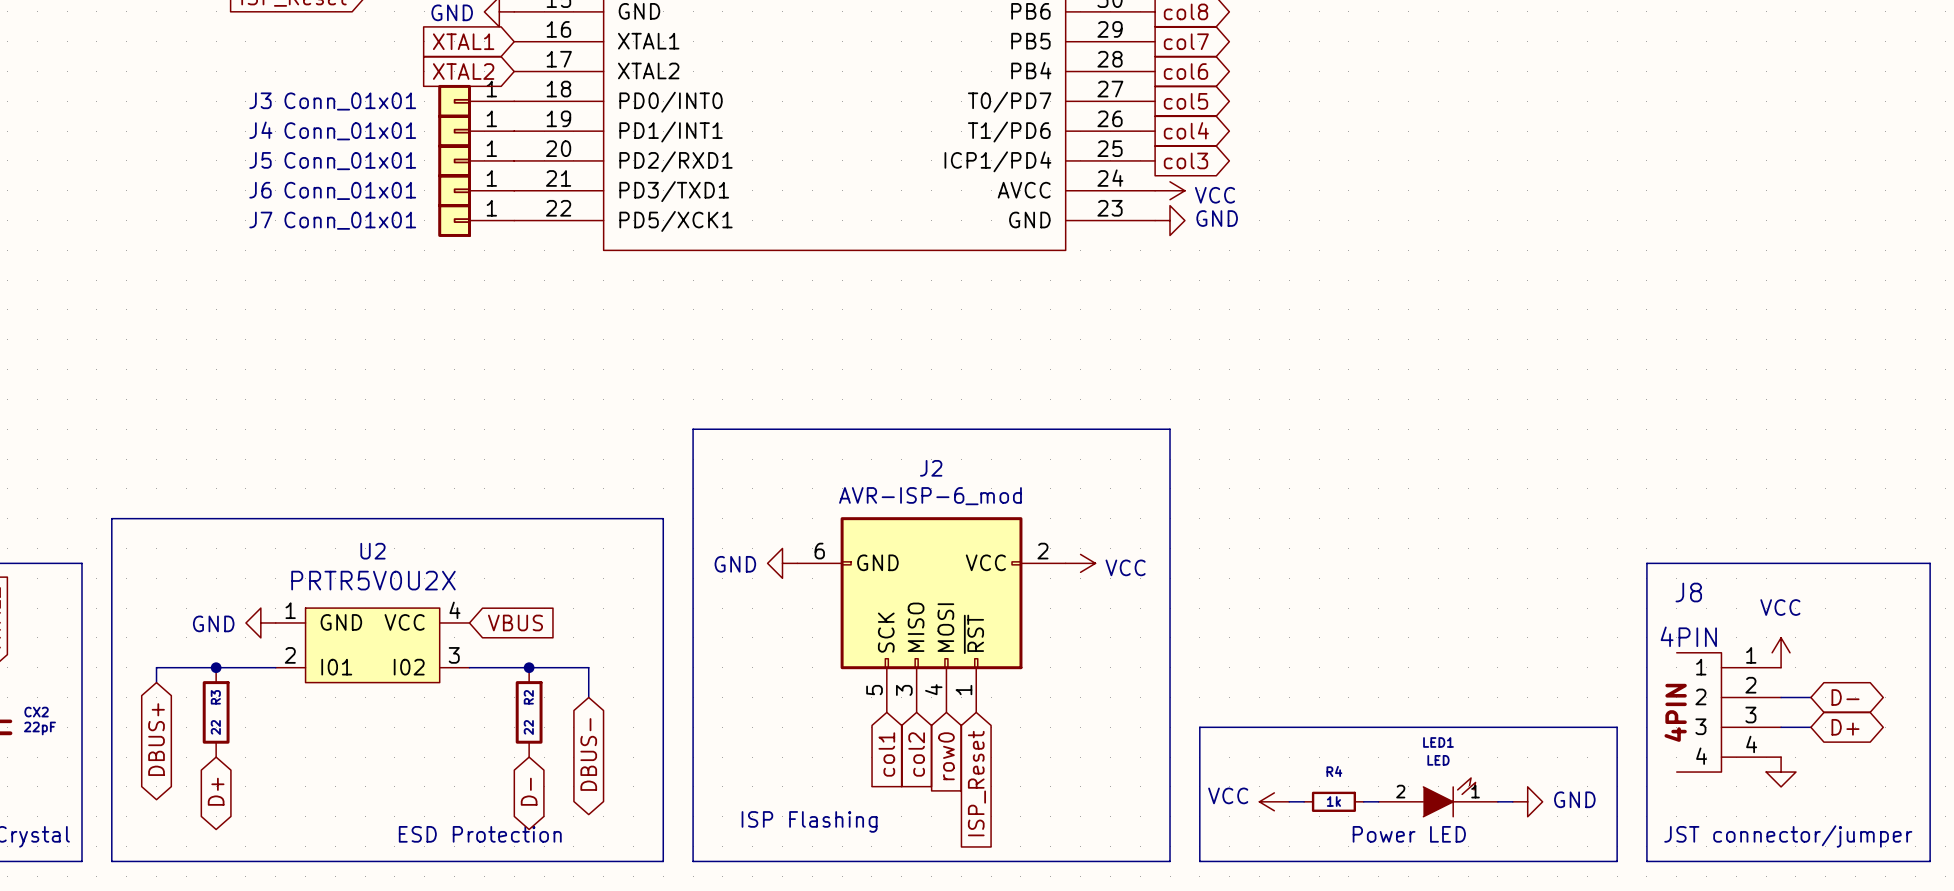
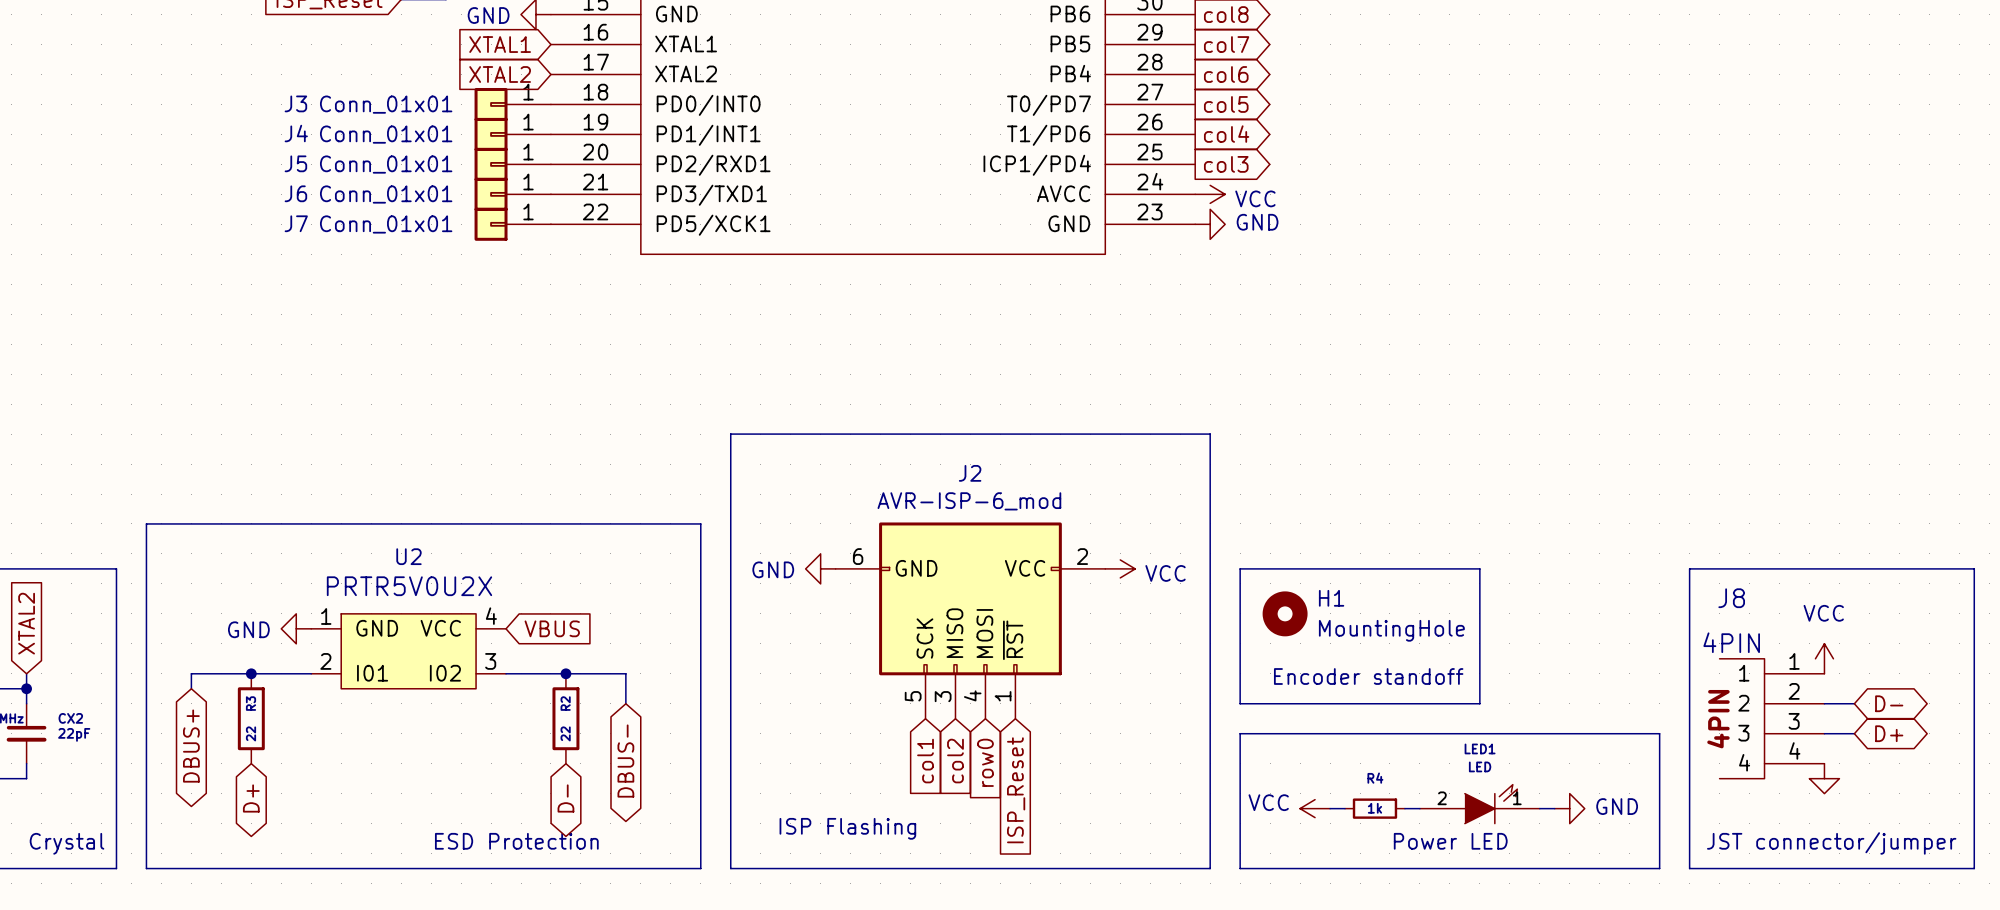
line: none -> (1240, 568) (1479, 568) (1479, 703) (1240, 703) (1240, 568)
H1: none -> MountingHole (1285, 613)
text: none -> Encoder standoff (1368, 676)

